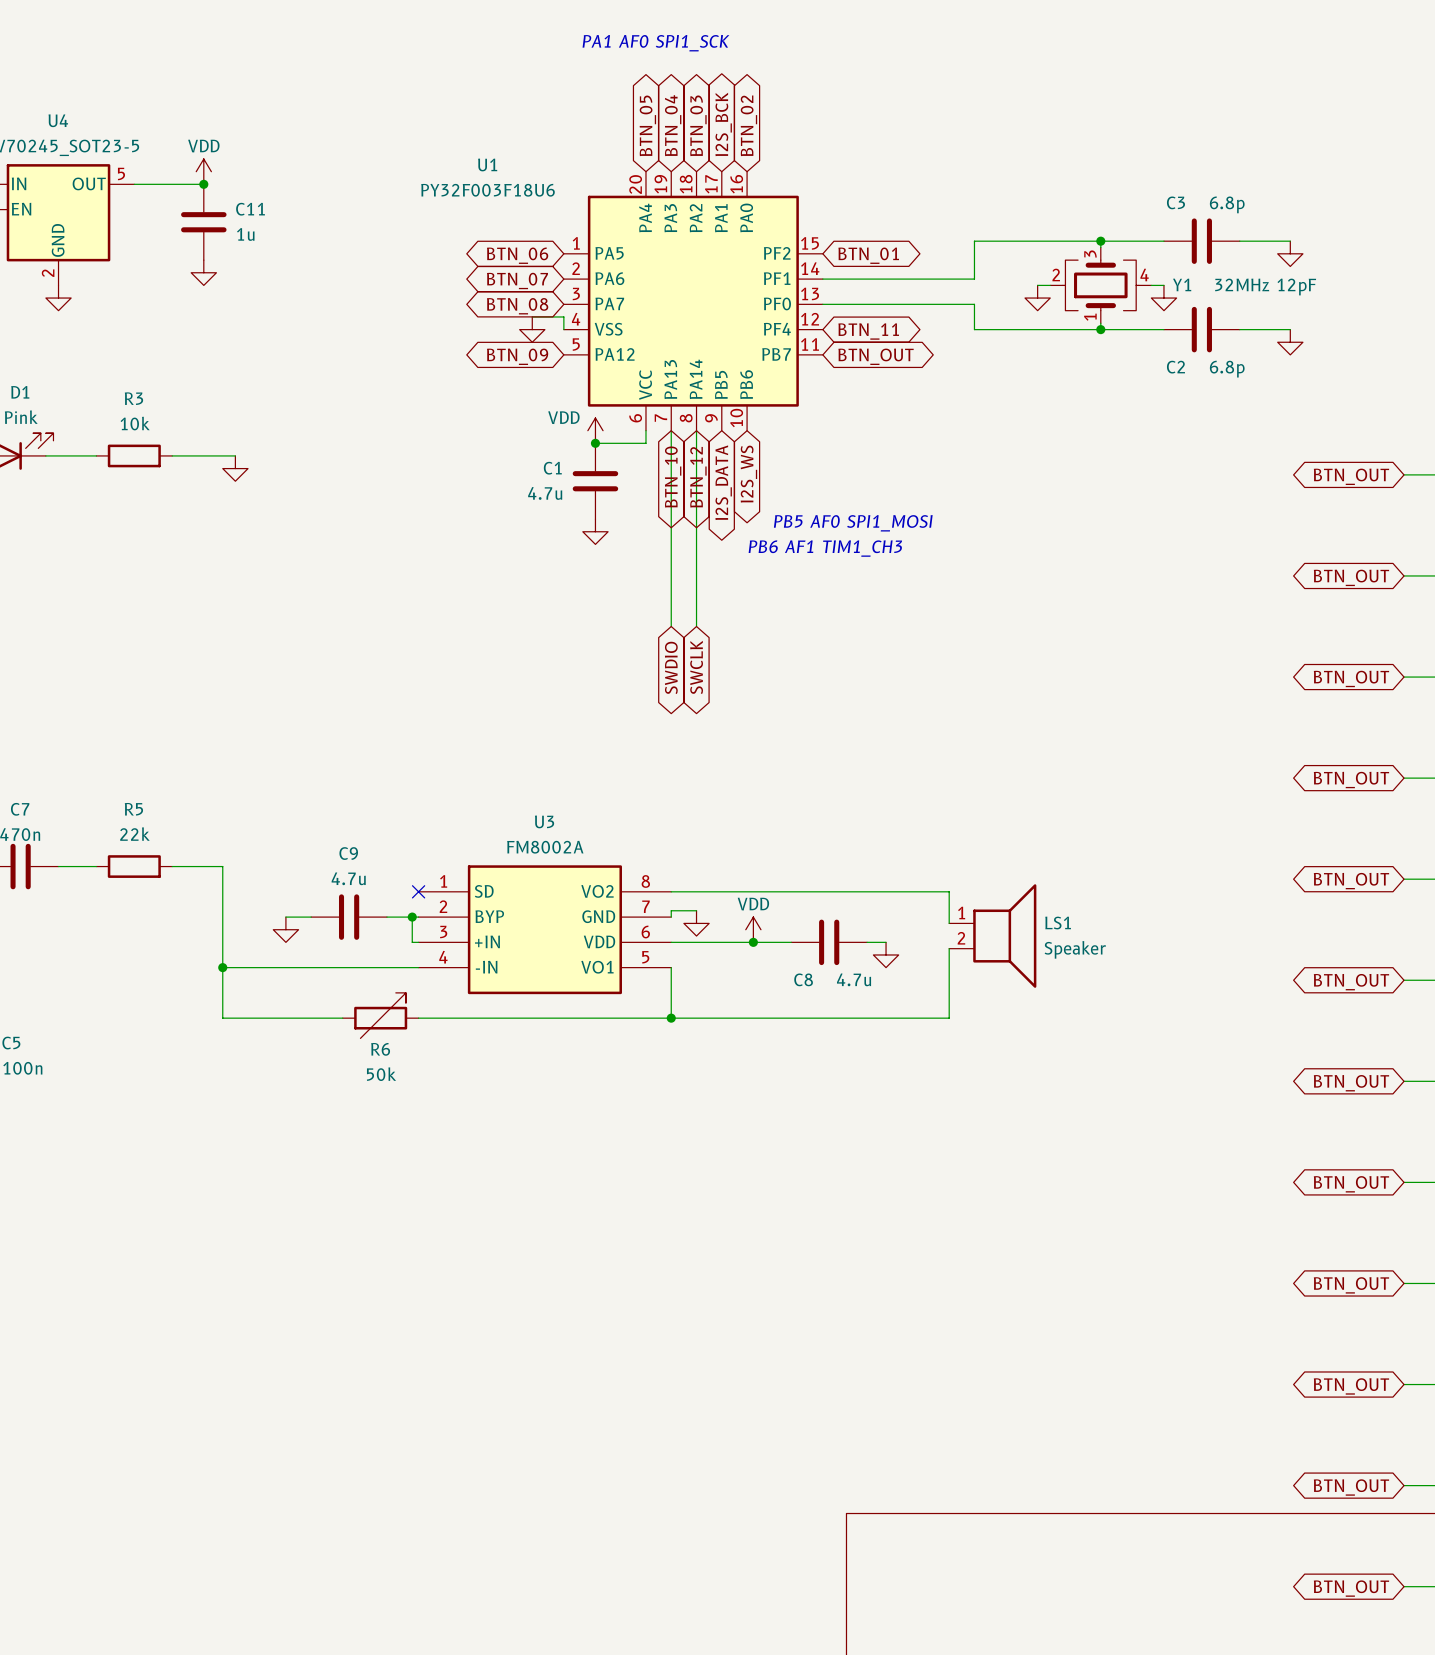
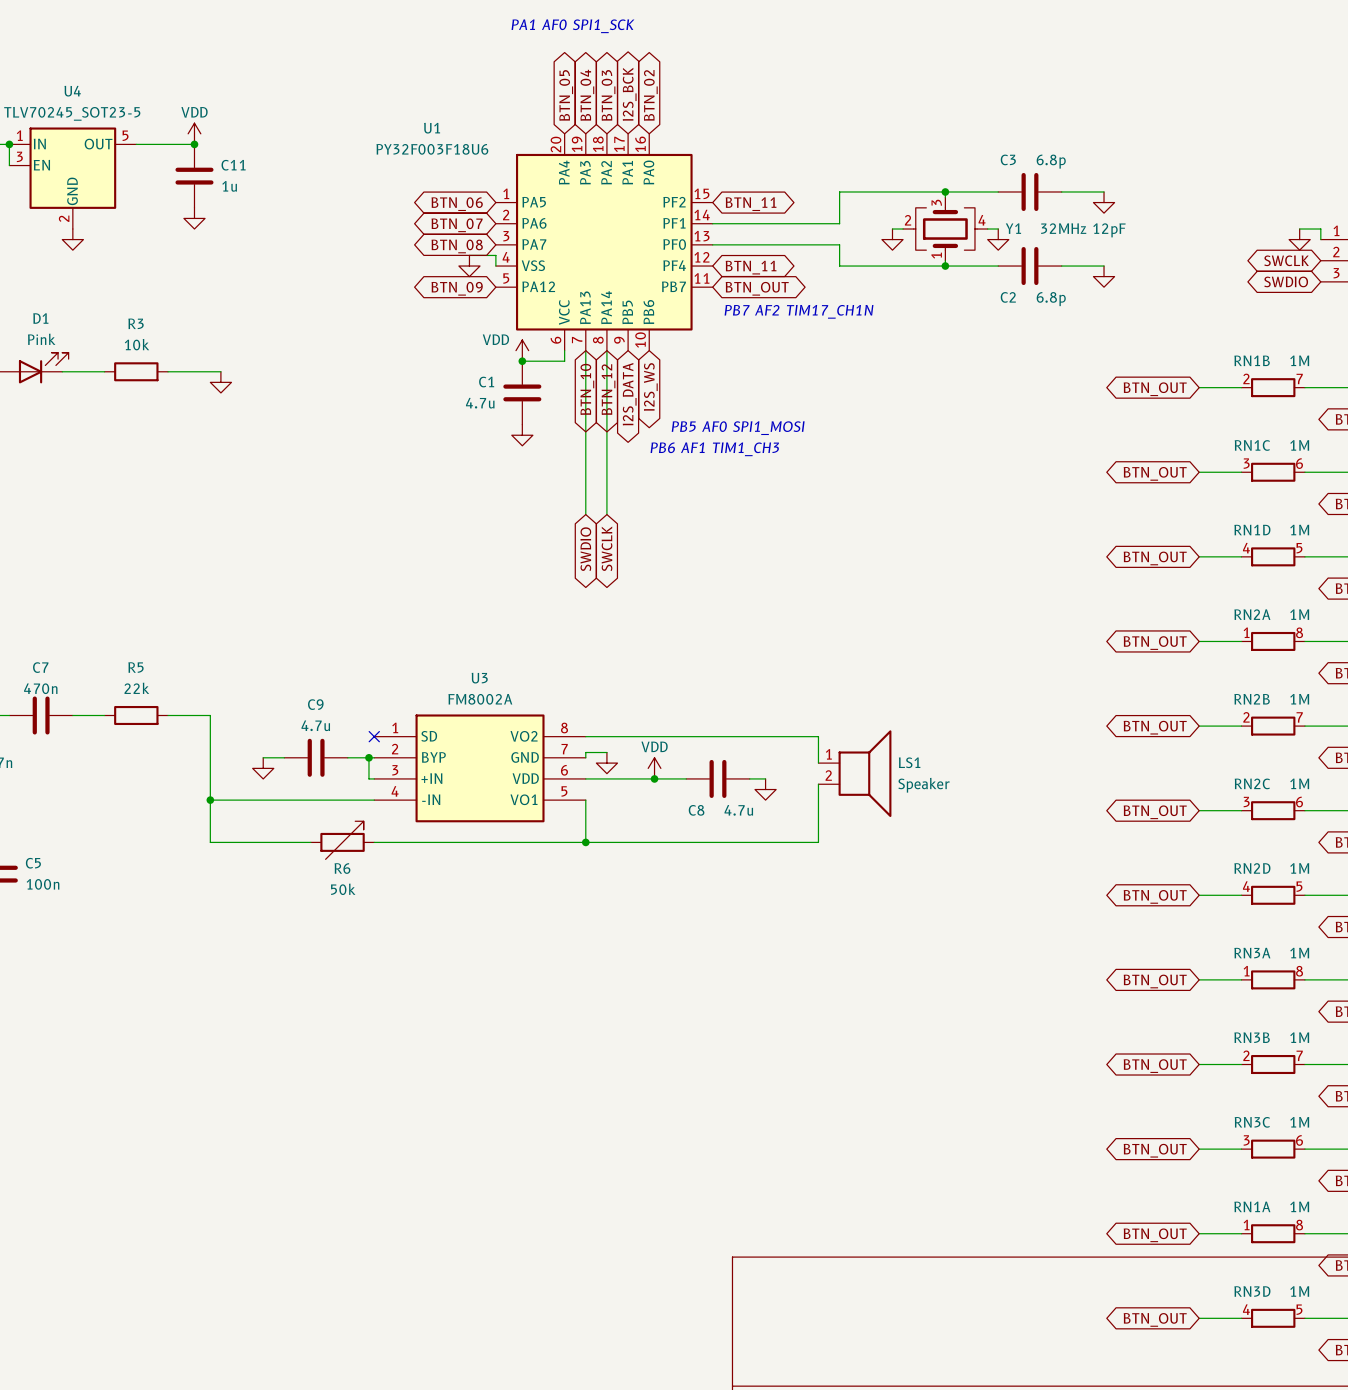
global label: BTN_01 (868, 255) -> BTN_11 (751, 204)
text: none -> PB7 AF2 TIM17_CH1N (799, 311)

